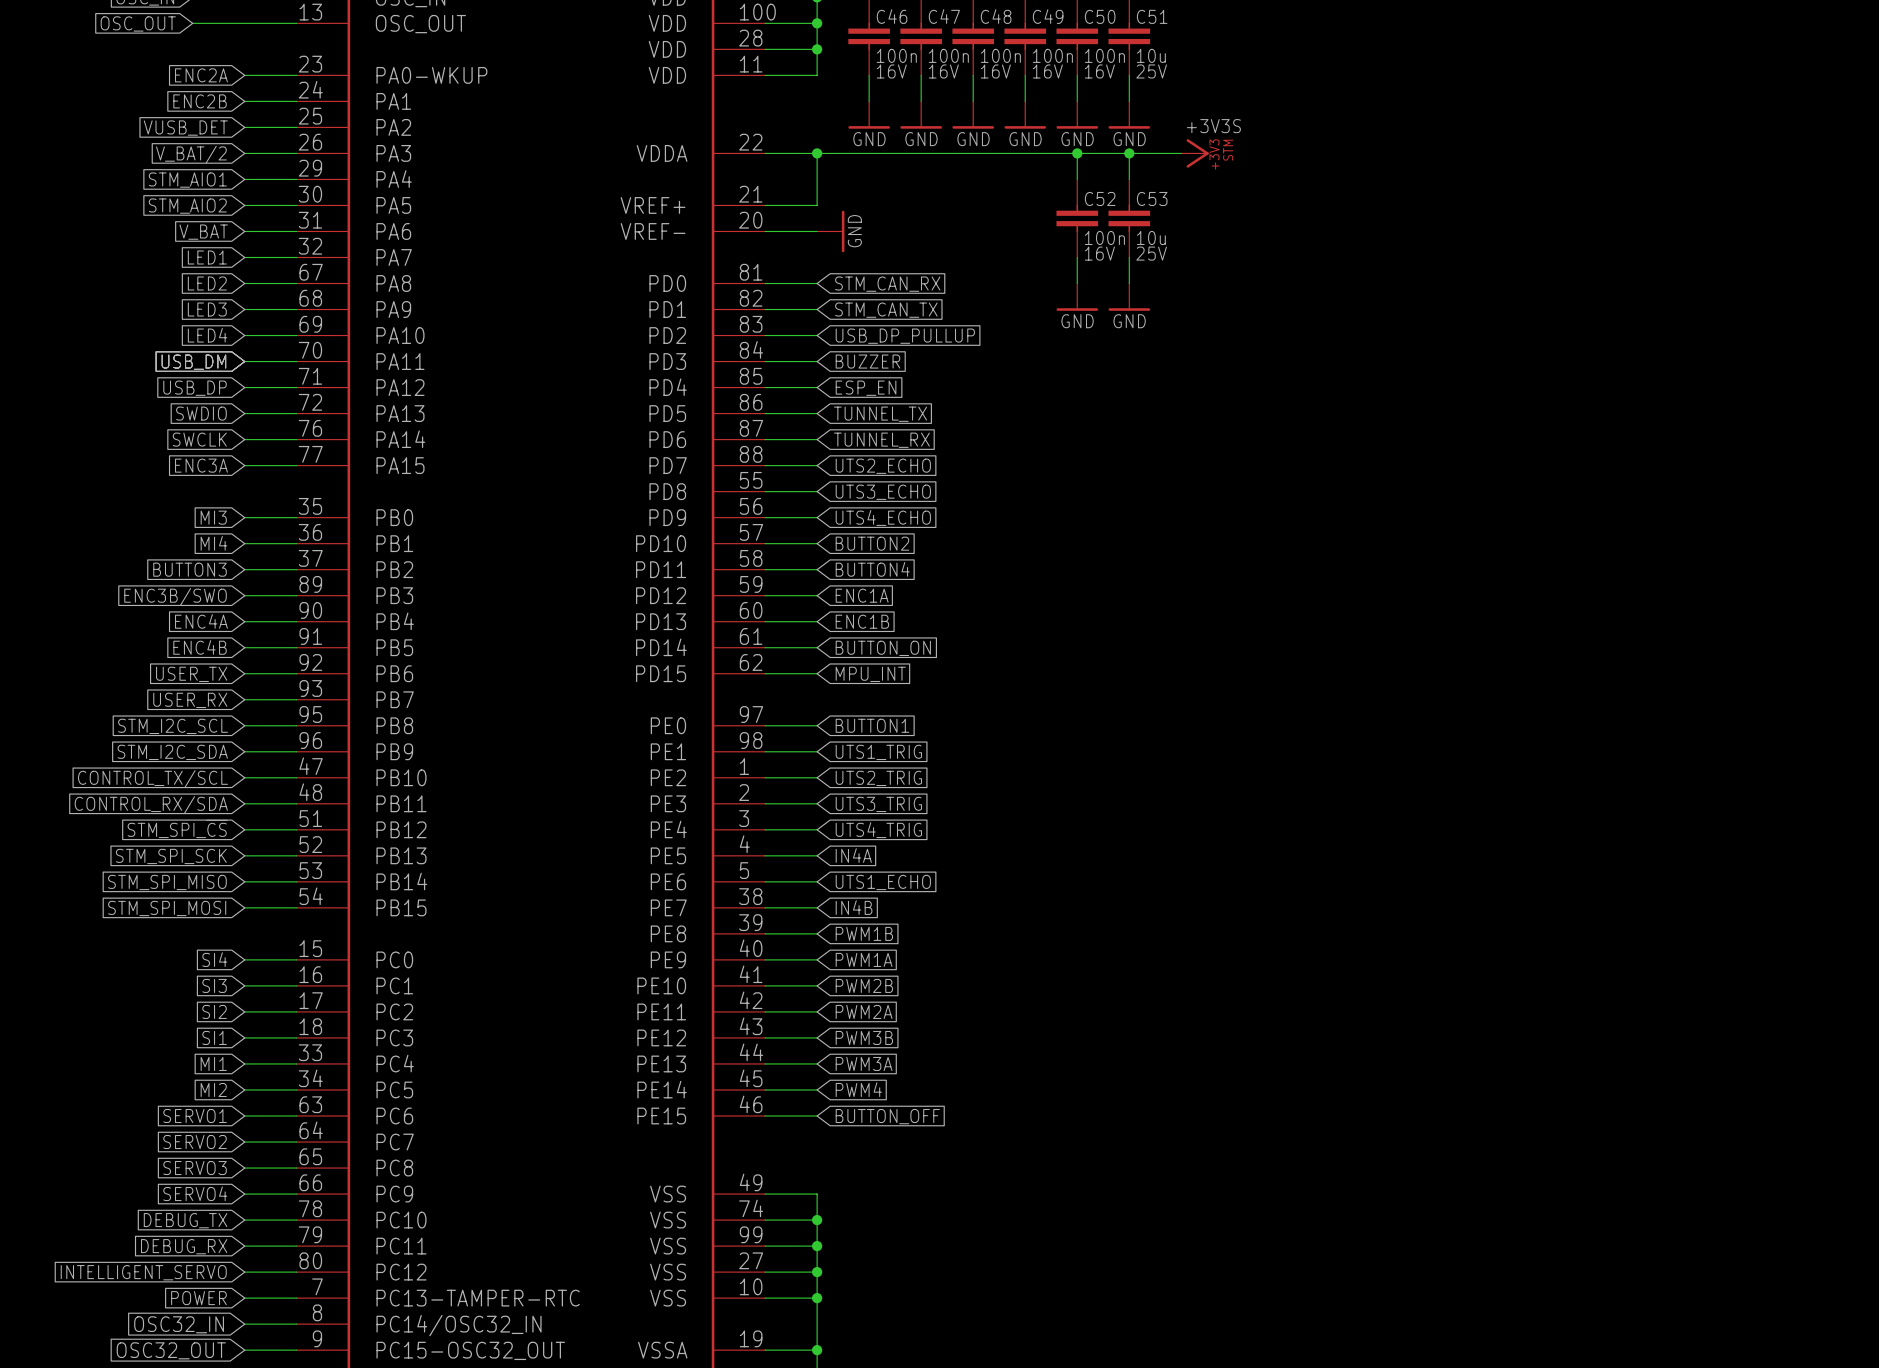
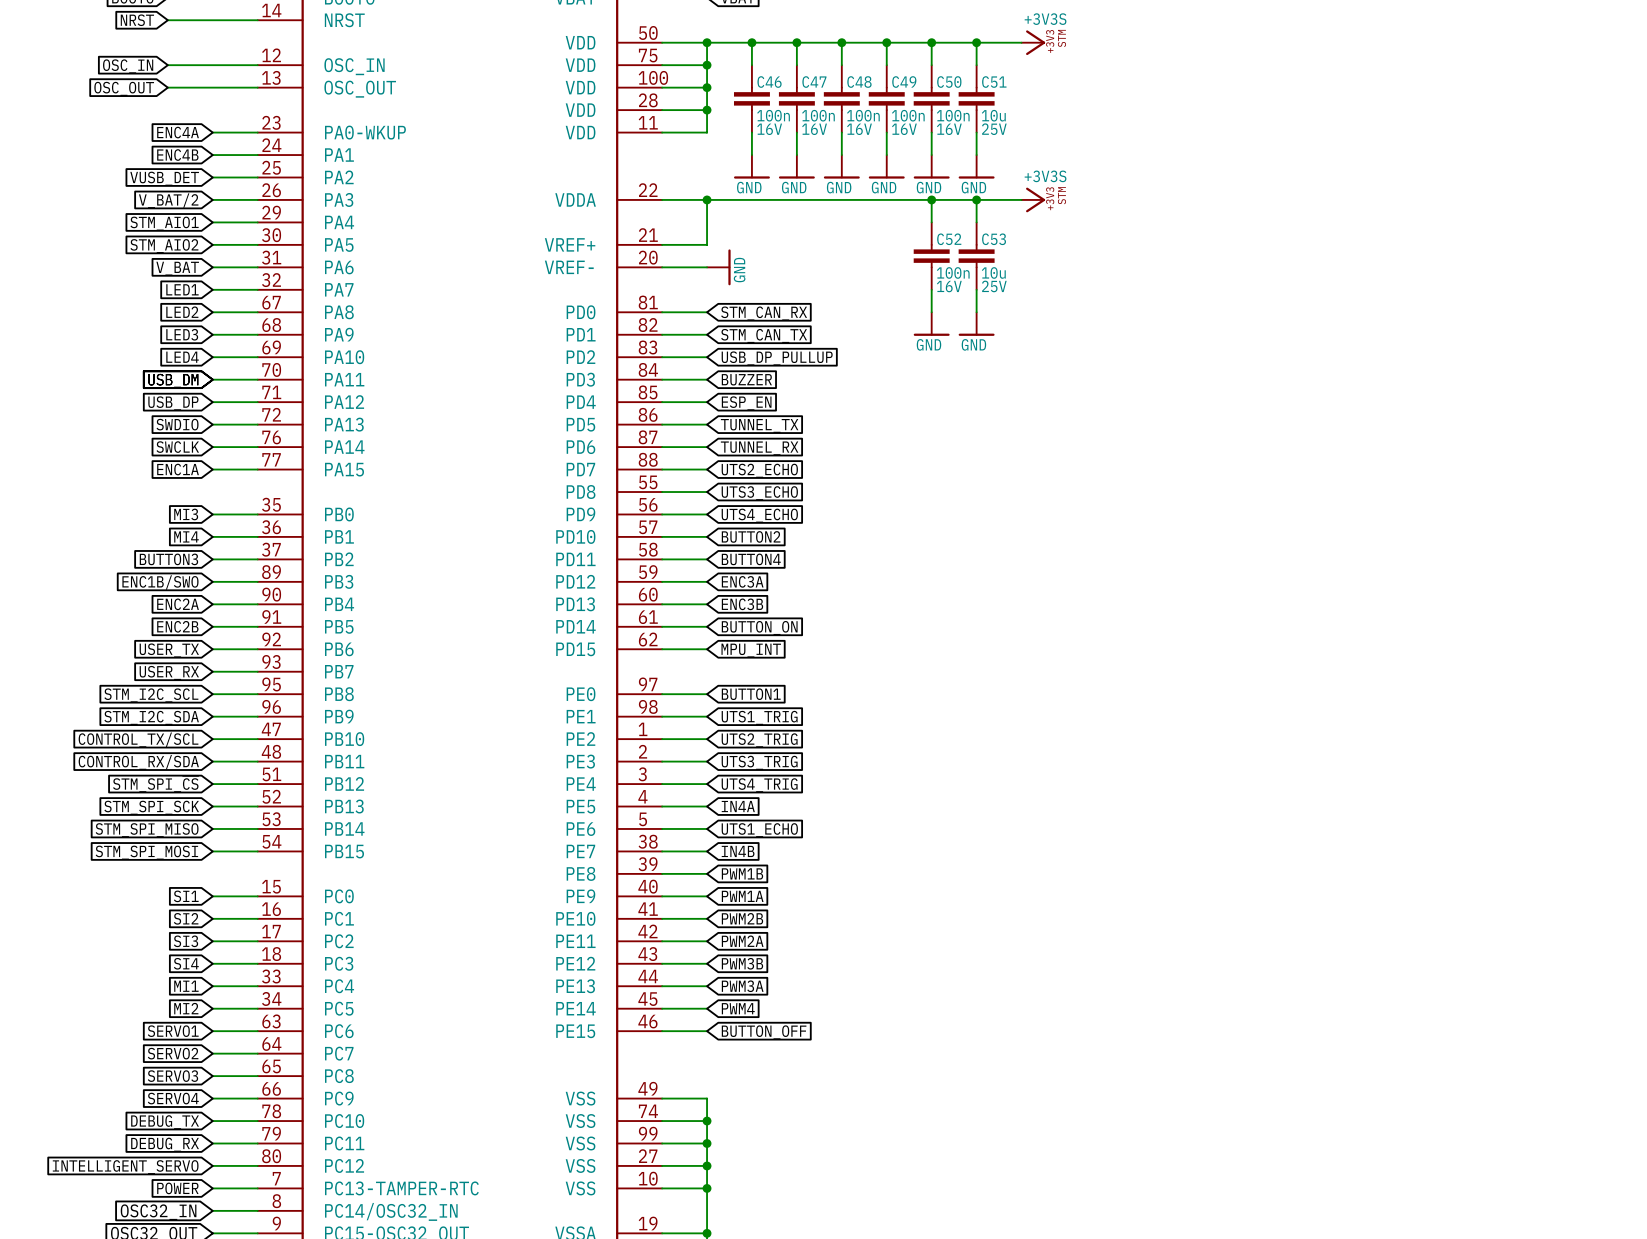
global label: ENC2A (201, 75) -> ENC4A (178, 132)
global label: ENC2B (200, 101) -> ENC4B (177, 155)
global label: ENC3A (201, 465) -> ENC1A (178, 469)
global label: ENC1A (862, 595) -> ENC3A (742, 581)
global label: ENC3B/SWO (175, 596) -> ENC1B/SWO (160, 582)
global label: ENC4A (201, 621) -> ENC2A (178, 604)
global label: ENC1B (862, 621) -> ENC3B (742, 604)
global label: ENC4B (200, 647) -> ENC2B (177, 626)
global label: SI4 (214, 959) -> SI1 (186, 896)
global label: SI3 (214, 985) -> SI2 (186, 918)
global label: SI2 (214, 1011) -> SI3 (186, 941)
global label: SI1 (214, 1037) -> SI4 (186, 963)

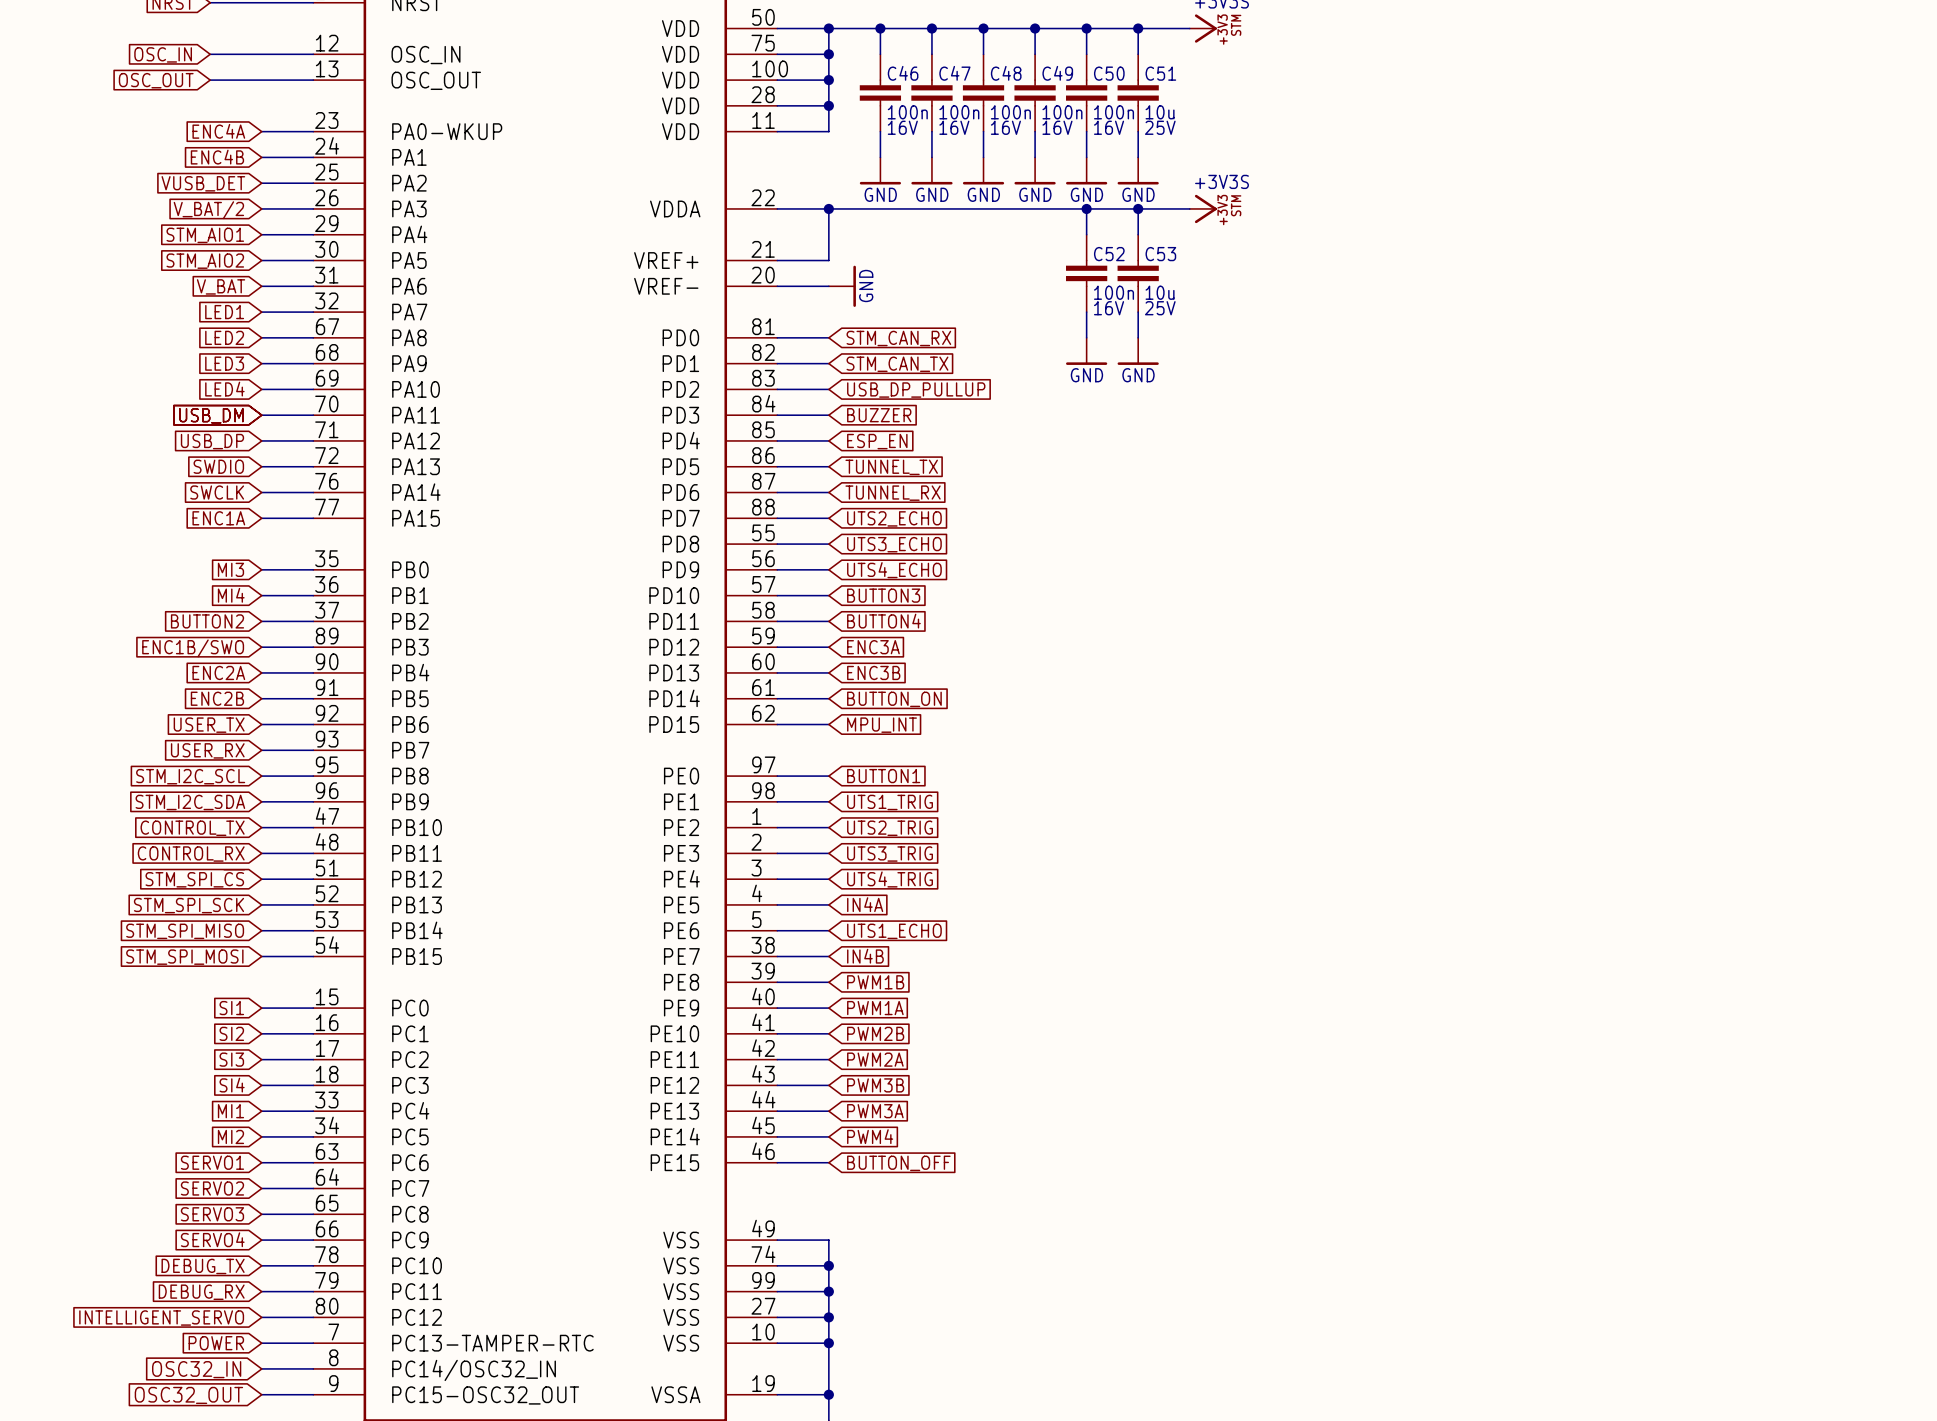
global label: BUTTON2 (751, 536) -> BUTTON3 (883, 595)
global label: BUTTON3 (168, 559) -> BUTTON2 (207, 621)
global label: CONTROL_TX/SCL (138, 739) -> CONTROL_TX (192, 828)
global label: CONTROL_RX/SDA (138, 762) -> CONTROL_RX (191, 854)

